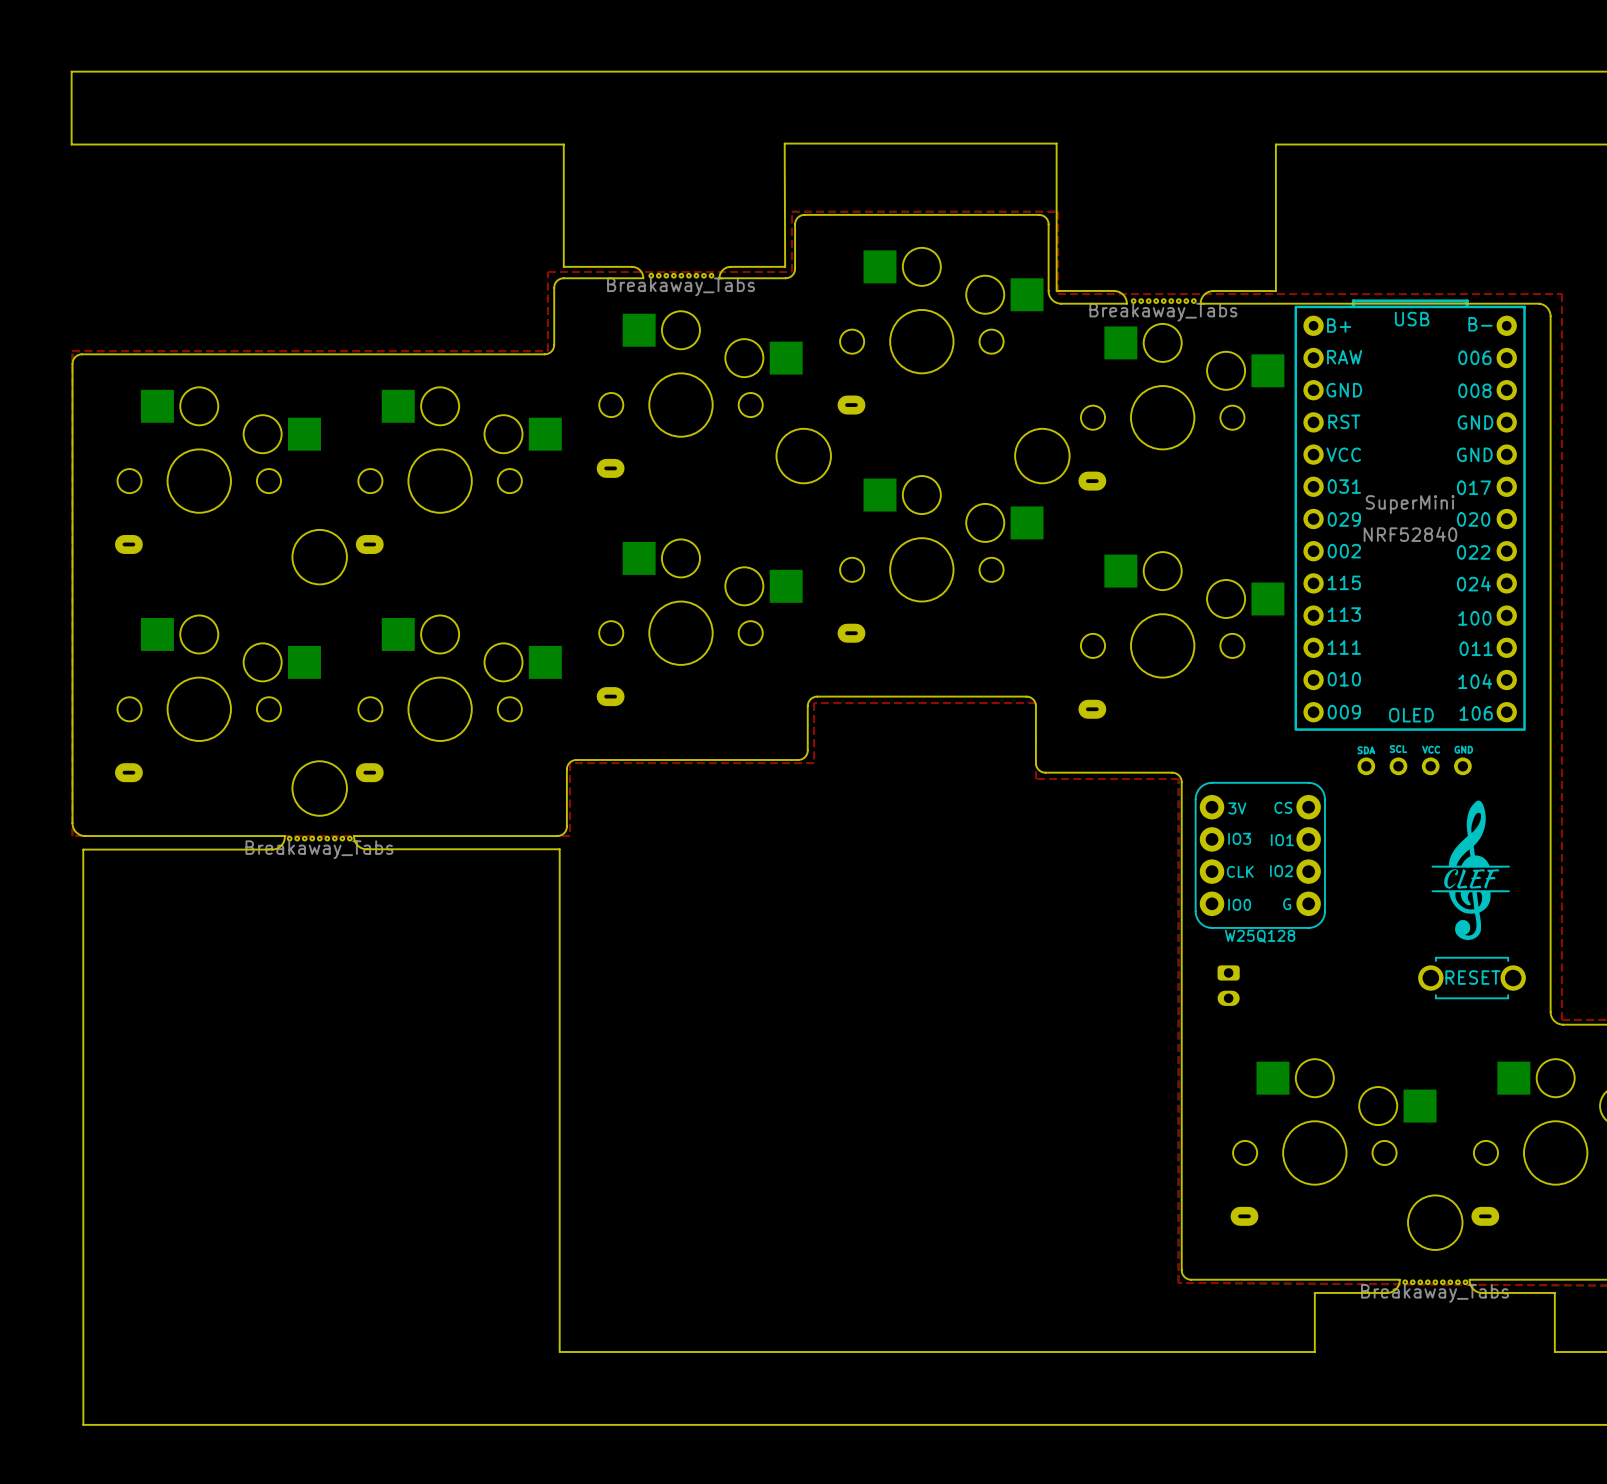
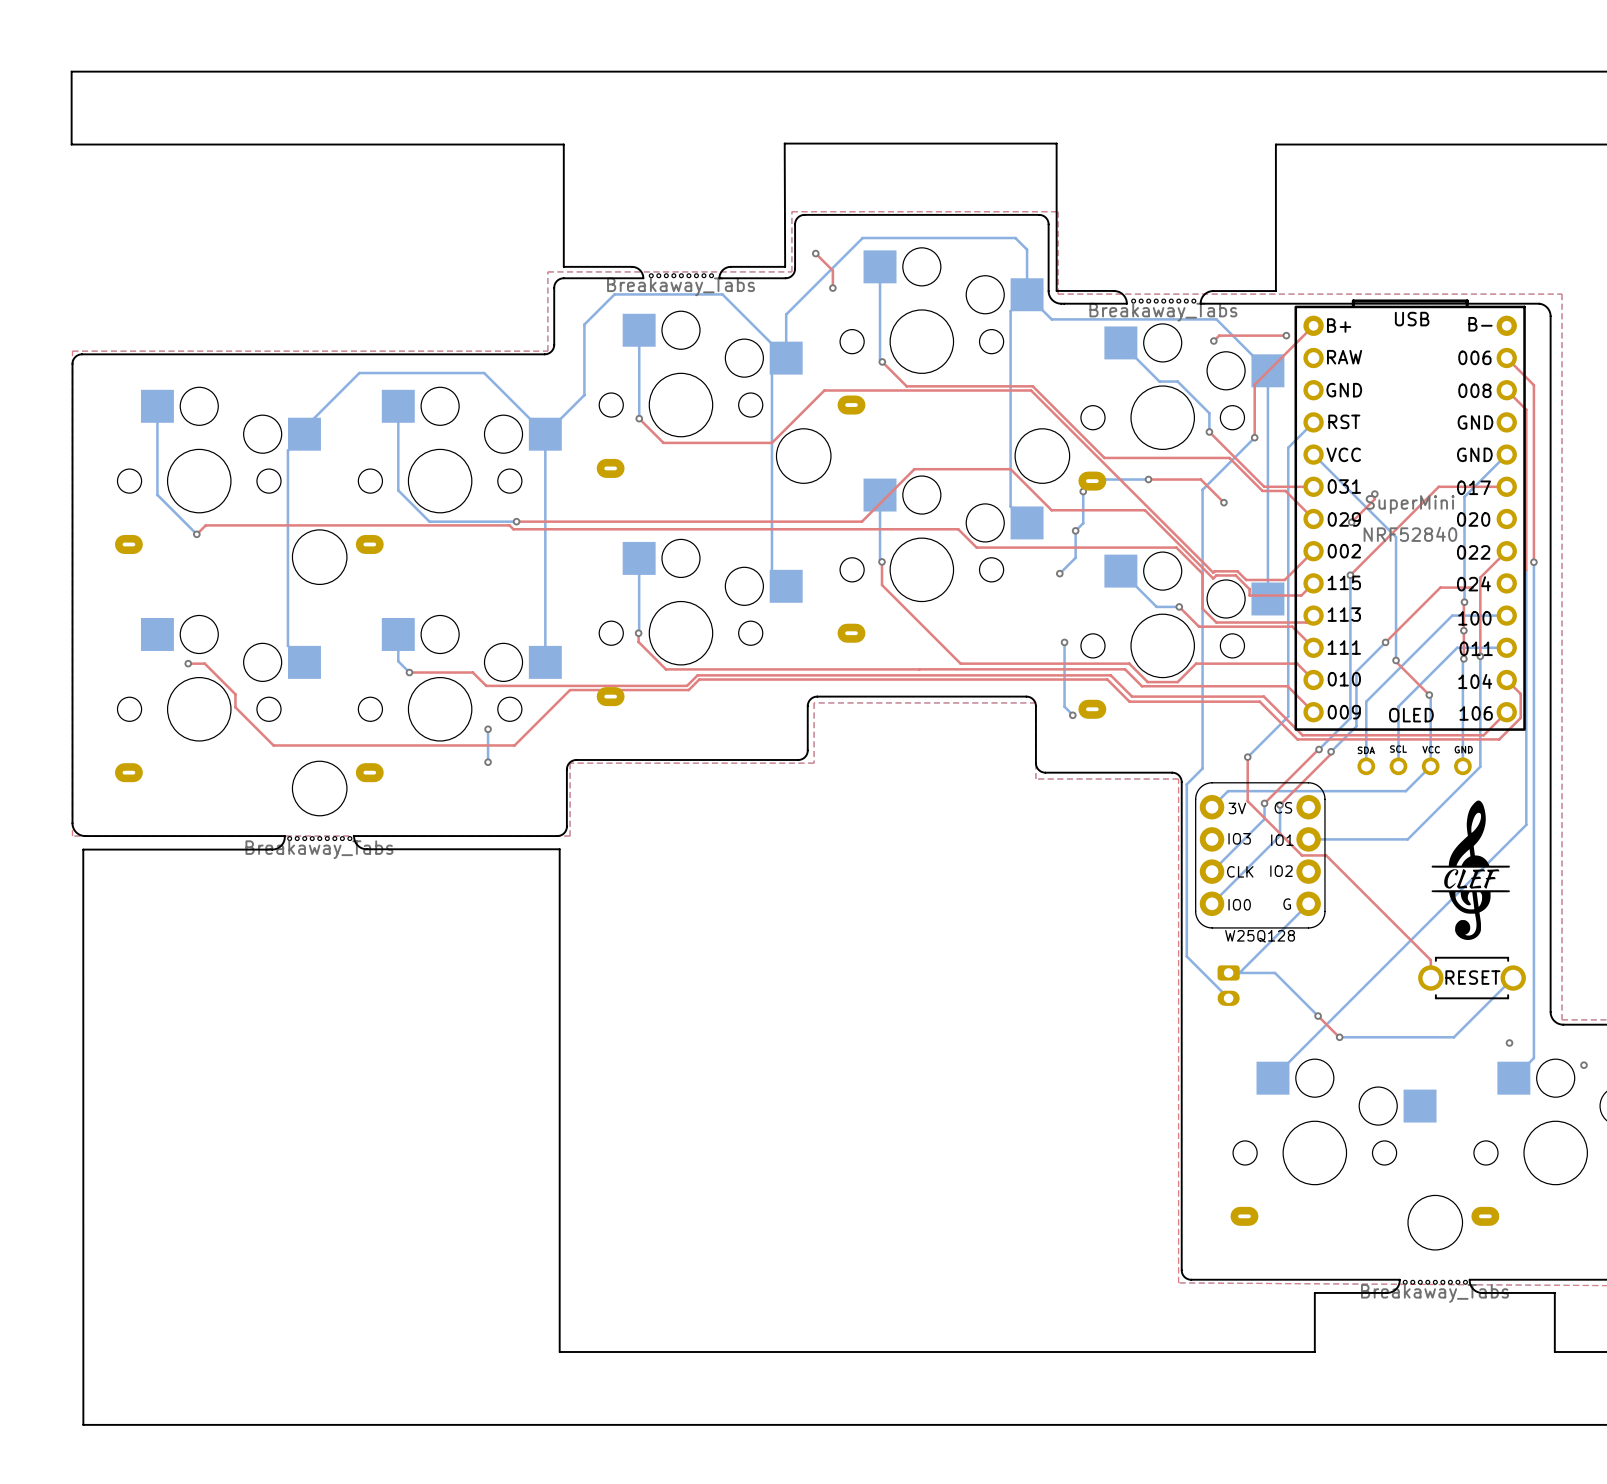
top track: none -> (815, 253) (832, 270) (832, 288)
via: none -> (815, 253)
bottom track: none -> (880, 266) (880, 359) (882, 361)
via: none -> (832, 288)
bottom track: none -> (1027, 294) (1027, 249) (1015, 238) (862, 238) (786, 314) (786, 358)
bottom track: none -> (1027, 294) (1051, 319) (1216, 319) (1267, 370) (1267, 598)
bottom track: none -> (1027, 294) (1010, 311) (1010, 506) (1027, 522)
top track: none -> (1313, 325) (1254, 384) (1254, 437)
bottom track: none -> (639, 330) (639, 418)
top track: none -> (1286, 335) (1219, 335) (1213, 341)
via: none -> (1286, 335)
via: none -> (1213, 341)
bottom track: none -> (1120, 342) (1159, 381) (1177, 381) (1209, 413) (1209, 431)
bottom track: none -> (786, 358) (722, 294) (614, 294) (584, 324) (584, 395) (545, 434)
bottom track: none -> (786, 358) (771, 372) (771, 572) (786, 586)
top track: none -> (1506, 358) (1533, 385) (1533, 562)
top track: none -> (882, 361) (906, 386) (1032, 386) (1104, 457) (1229, 457) (1262, 490) (1285, 490) (1313, 519)
via: none -> (882, 361)
top track: none -> (1506, 390) (1526, 409) (1526, 570)
bottom track: none -> (157, 406) (157, 494) (196, 534)
bottom track: none -> (398, 406) (398, 490) (429, 521) (516, 521)
top track: none -> (639, 418) (663, 442) (771, 442) (824, 390) (1031, 390) (1213, 572) (1237, 571) (1246, 579) (1284, 579) (1313, 551)
via: none -> (639, 418)
bottom track: none -> (1313, 422) (1288, 447) (1288, 716) (1247, 757)
top track: none -> (1209, 431) (1264, 486) (1313, 486)
via: none -> (1209, 431)
bottom track: none -> (545, 434) (484, 373) (359, 373) (304, 427) (304, 434) (287, 450) (287, 645) (304, 662)
bottom track: none -> (545, 434) (545, 662)
bottom track: none -> (1254, 437) (1202, 489) (1202, 768) (1186, 784) (1186, 956) (1228, 998)
via: none -> (1254, 437)
bottom track: none -> (1313, 454) (1396, 537) (1396, 660)
bottom track: none -> (1506, 454) (1464, 496) (1464, 602)
top track: none -> (1148, 479) (1200, 479) (1223, 502)
bottom track: none -> (1148, 479) (1095, 479) (1083, 491) (1083, 523) (1075, 530) (1075, 557) (1059, 573)
via: none -> (1148, 479)
top track: none -> (1506, 486) (1438, 486) (1350, 575)
via: none -> (1083, 491)
top track: none -> (1374, 494) (1374, 499) (1351, 522)
via: none -> (1374, 494)
bottom track: none -> (880, 495) (880, 559) (882, 561)
via: none -> (1223, 502)
top track: none -> (516, 521) (861, 521) (914, 469) (1010, 469) (1051, 510) (1145, 510) (1213, 578) (1216, 575) (1235, 575) (1249, 589) (1249, 595) (1301, 595) (1313, 583)
via: none -> (516, 521)
via: none -> (1351, 522)
via: none -> (1075, 530)
top track: none -> (196, 534) (205, 525) (509, 525) (513, 529) (958, 529) (976, 547) (1176, 547) (1202, 573) (1202, 608) (1216, 622) (1306, 622) (1313, 615)
via: none -> (196, 534)
top track: none -> (1506, 551) (1480, 577) (1480, 656)
bottom track: none -> (639, 558) (638, 633)
top track: none -> (882, 561) (882, 585) (960, 663) (1129, 663) (1147, 682) (1177, 682) (1196, 663) (1297, 663) (1313, 679)
via: none -> (882, 561)
bottom track: none -> (1533, 562) (1533, 1058) (1513, 1078)
via: none -> (1533, 562)
bottom track: none -> (1526, 570) (1526, 824) (1272, 1078)
bottom track: none -> (1120, 571) (1156, 606) (1179, 606)
via: none -> (1059, 573)
bottom track: none -> (1350, 575) (1350, 718) (1319, 749)
via: none -> (1350, 575)
top track: none -> (1472, 587) (1440, 587) (1385, 642)
top track: none -> (1464, 602) (1463, 658)
via: none -> (1464, 602)
top track: none -> (1179, 606) (1199, 626) (1292, 626) (1313, 647)
via: none -> (1179, 606)
bottom track: none -> (1506, 615) (1452, 615) (1366, 701) (1366, 766)
via: none -> (1463, 630)
top track: none -> (638, 633) (638, 642) (665, 669) (919, 669)
via: none -> (638, 633)
bottom track: none -> (398, 634) (398, 661) (409, 672)
bottom track: none -> (1064, 642) (1064, 706) (1072, 715)
via: none -> (1064, 642)
bottom track: none -> (1385, 642) (1356, 671) (1356, 726) (1331, 751)
via: none -> (1385, 642)
bottom track: none -> (1506, 647) (1457, 647) (1398, 706) (1398, 766)
bottom track: none -> (1480, 656) (1480, 766) (1407, 839) (1308, 839)
via: none -> (1480, 656)
bottom track: none -> (1463, 658) (1462, 766)
via: none -> (1463, 658)
top track: none -> (1396, 660) (1429, 695)
via: none -> (1396, 660)
top track: none -> (188, 663) (204, 663) (235, 694) (235, 707) (273, 745) (514, 745) (570, 690) (688, 690) (699, 679) (1107, 679) (1129, 701) (1259, 701) (1297, 739) (1499, 739) (1520, 717) (1520, 693) (1506, 679)
via: none -> (188, 663)
top track: none -> (919, 669) (1125, 669) (1141, 686) (1287, 686) (1313, 712)
top track: none -> (409, 672) (472, 672) (486, 685) (687, 685) (697, 675) (1110, 675) (1132, 696) (1263, 696) (1302, 735) (1483, 735) (1506, 712)
via: none -> (409, 672)
bottom track: none -> (1429, 695) (1430, 766) (1405, 791) (1228, 791) (1212, 807)
via: none -> (1429, 695)
via: none -> (1072, 715)
bottom track: none -> (488, 729) (488, 762)
via: none -> (488, 729)
top track: none -> (1319, 749) (1264, 803)
via: none -> (1319, 749)
top track: none -> (1331, 751) (1331, 753) (1280, 804)
via: none -> (1331, 751)
top track: none -> (1247, 757) (1247, 801) (1301, 855) (1326, 855) (1430, 960) (1430, 978)
via: none -> (1247, 757)
via: none -> (488, 762)
bottom track: none -> (1264, 803) (1264, 819) (1212, 871)
via: none -> (1264, 803)
bottom track: none -> (1280, 804) (1280, 835) (1212, 903)
via: none -> (1280, 804)
bottom track: none -> (1308, 903) (1239, 972)
bottom track: none -> (1228, 972) (1274, 972) (1318, 1016)
bottom track: none -> (1513, 978) (1453, 1037) (1339, 1037)
top track: none -> (1318, 1016) (1339, 1037)
via: none -> (1318, 1016)
via: none -> (1339, 1037)
via: none -> (1509, 1043)
via: none -> (1583, 1065)

